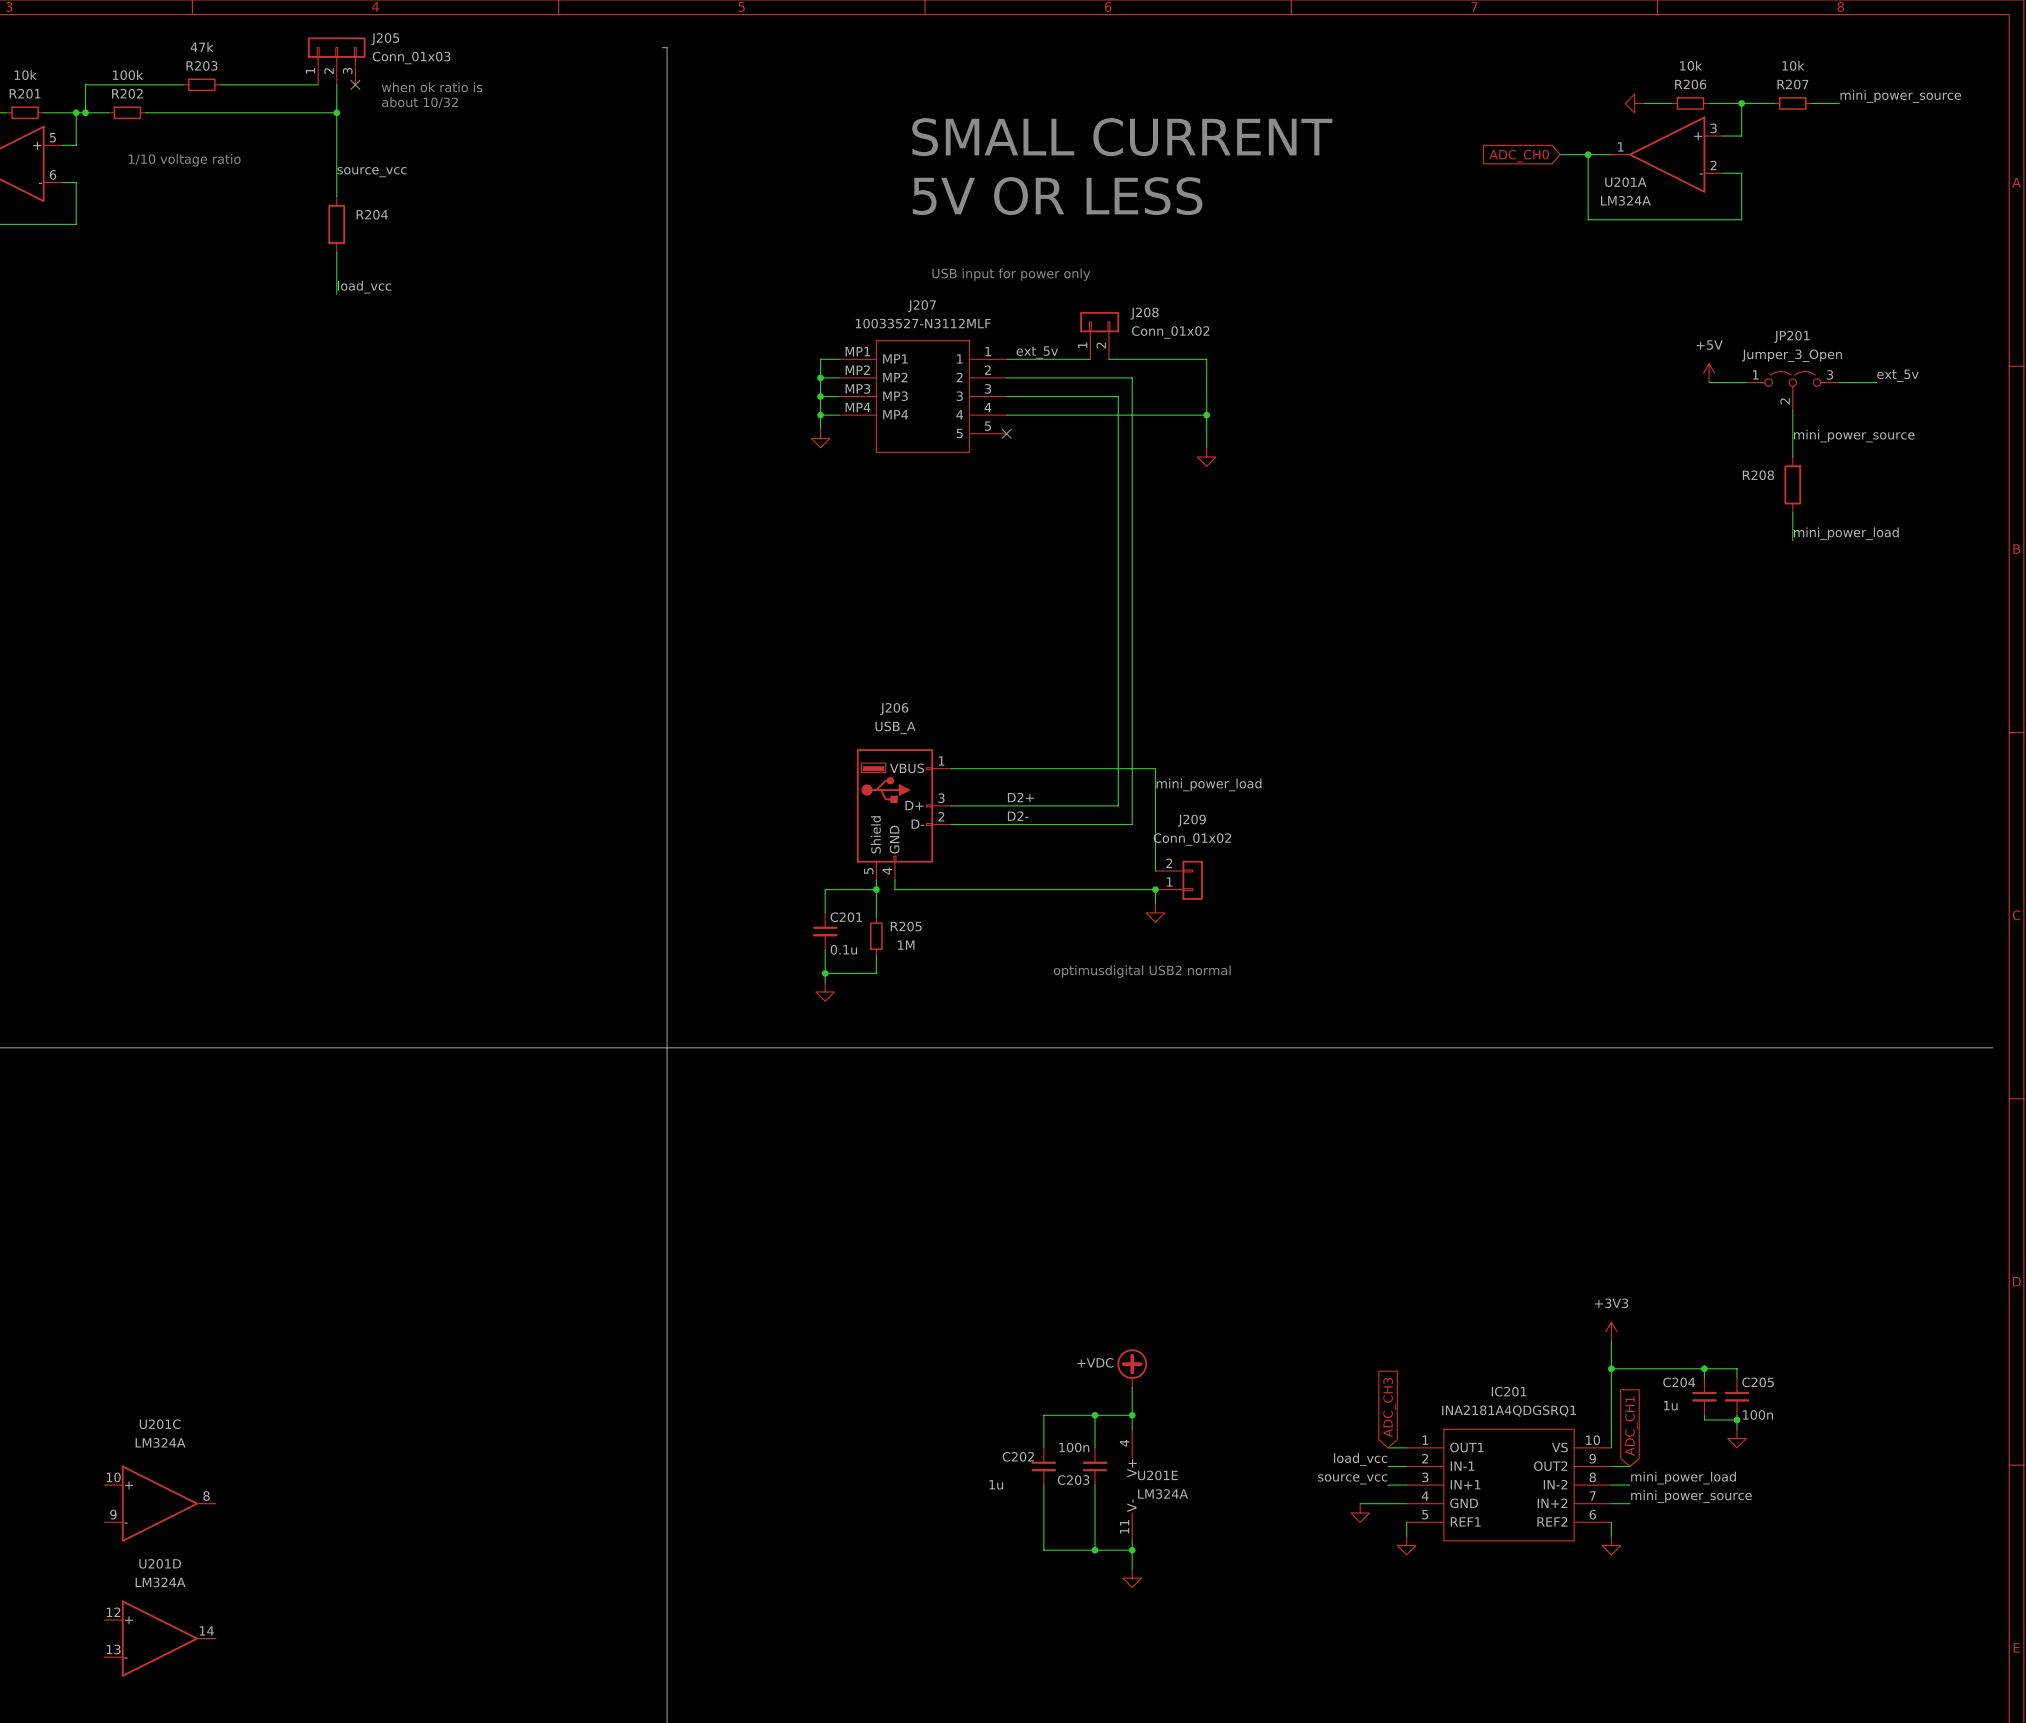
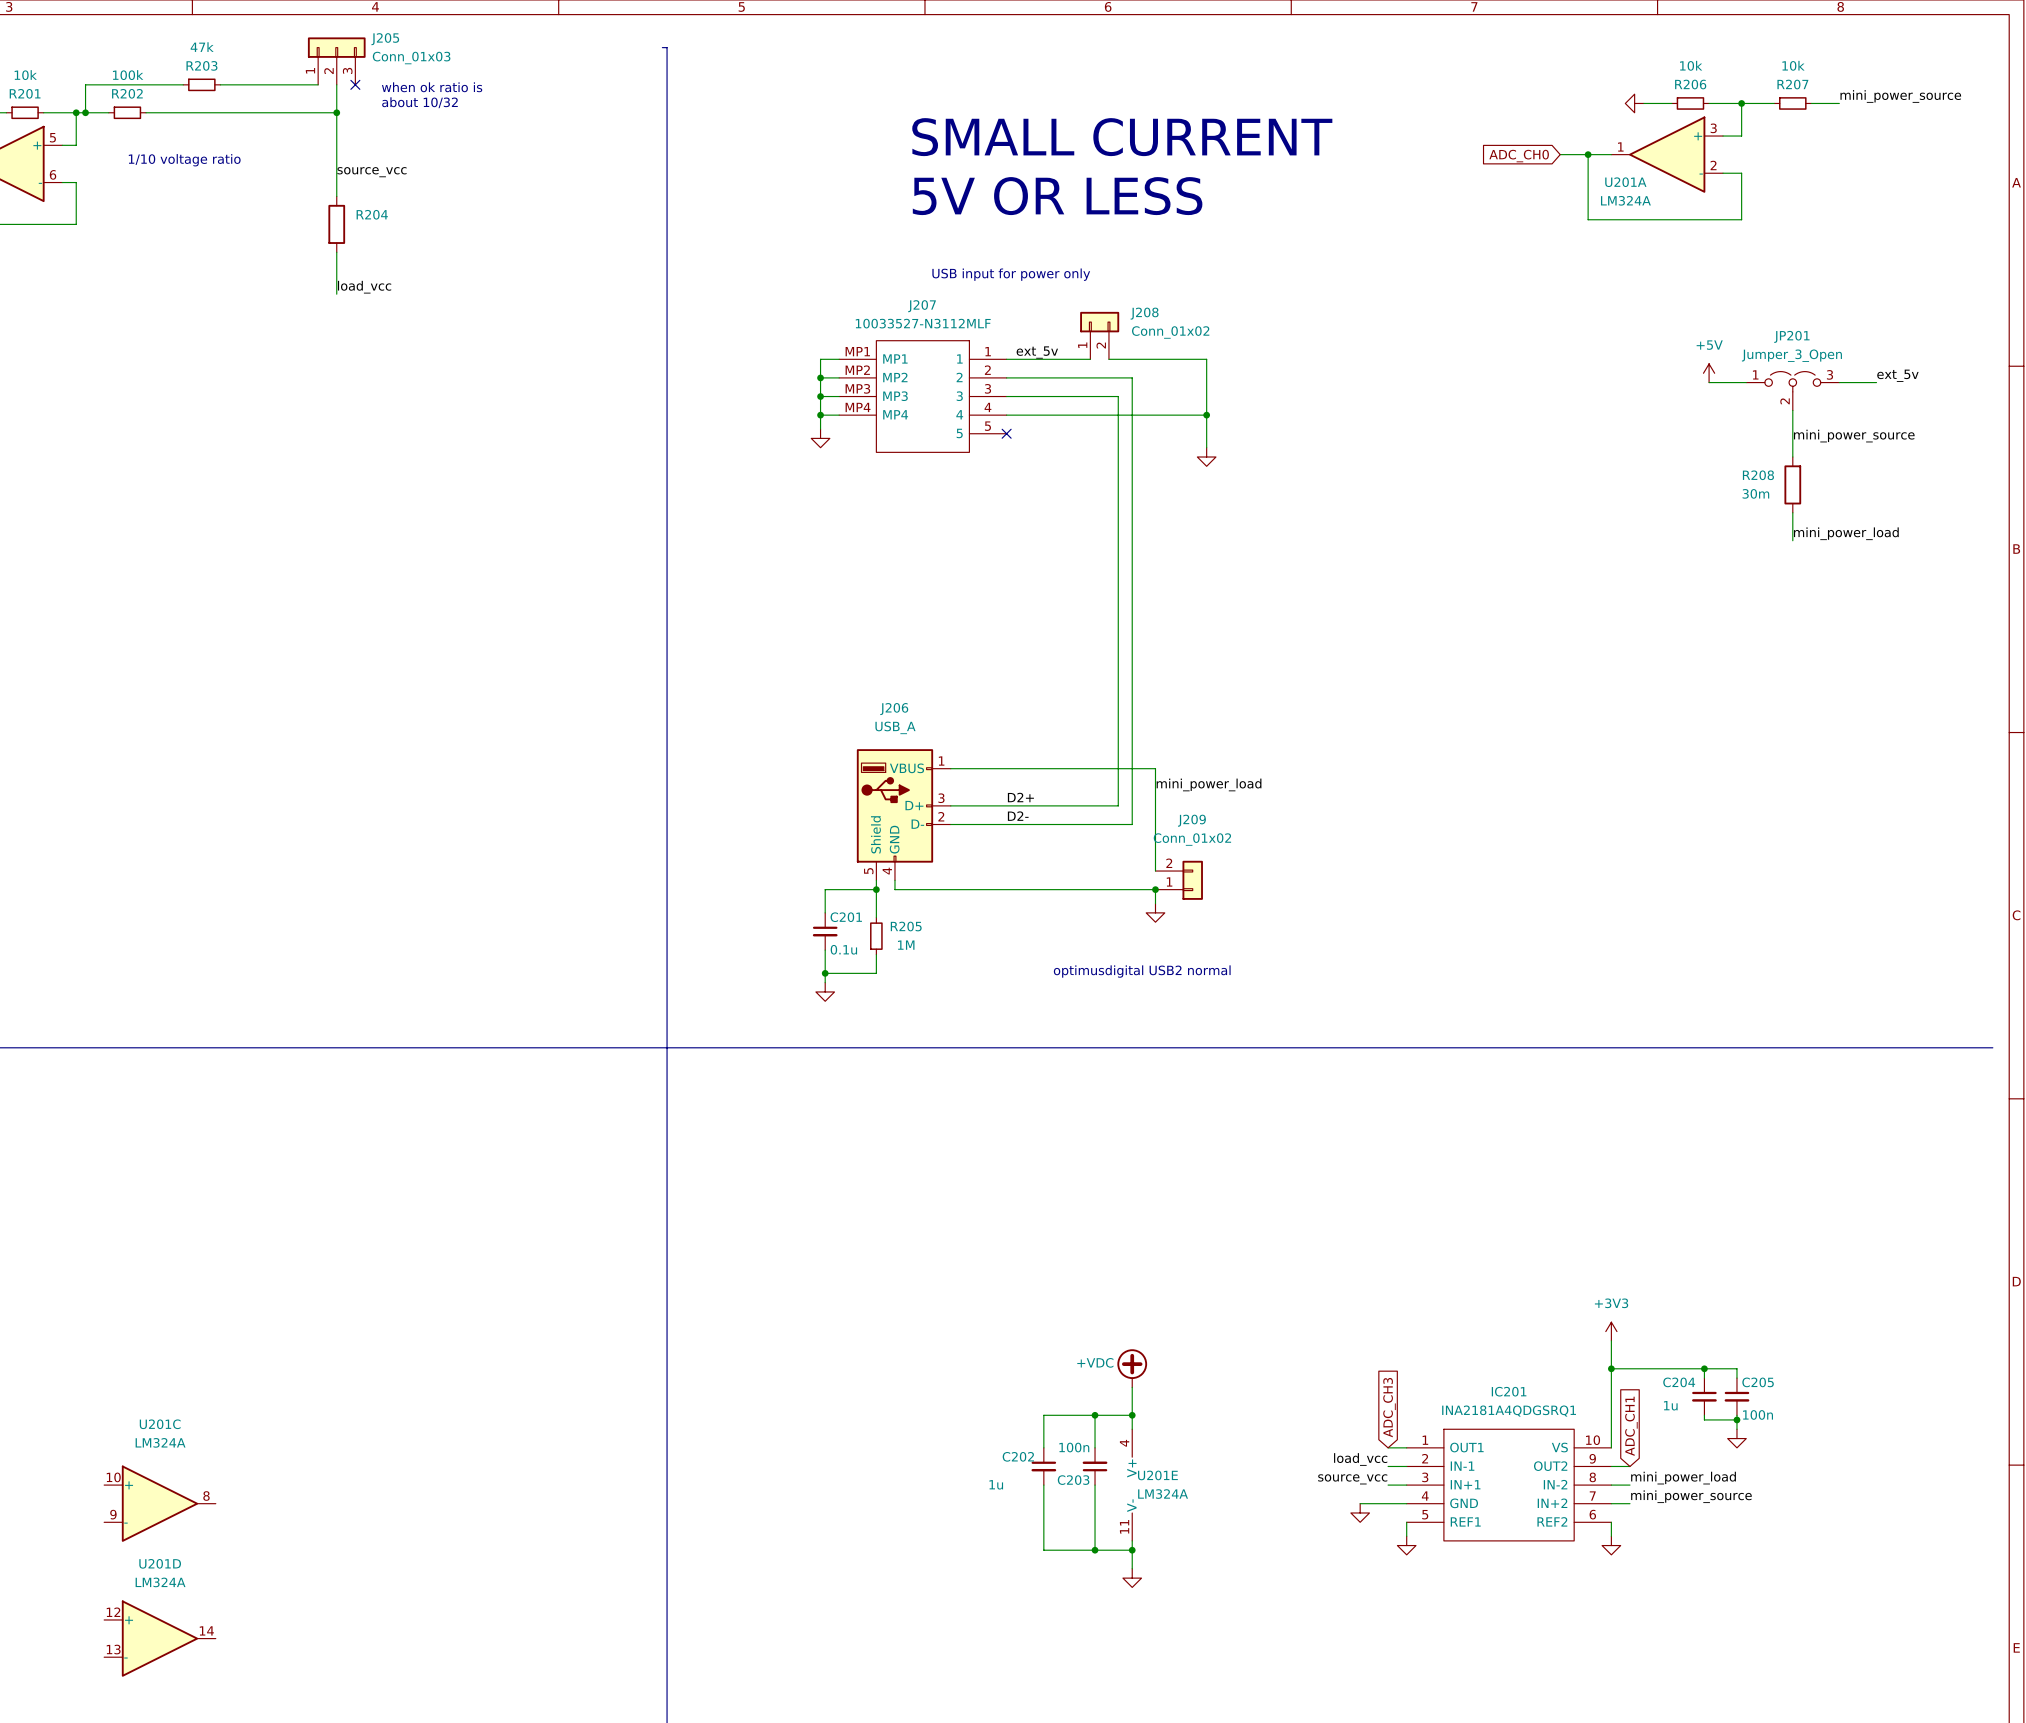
R208 value: none -> 30m (1755, 493)

